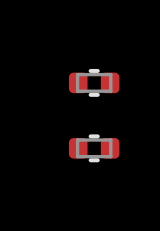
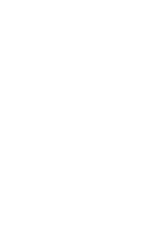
part: (94, 82) -> none
part: (94, 148) -> none

